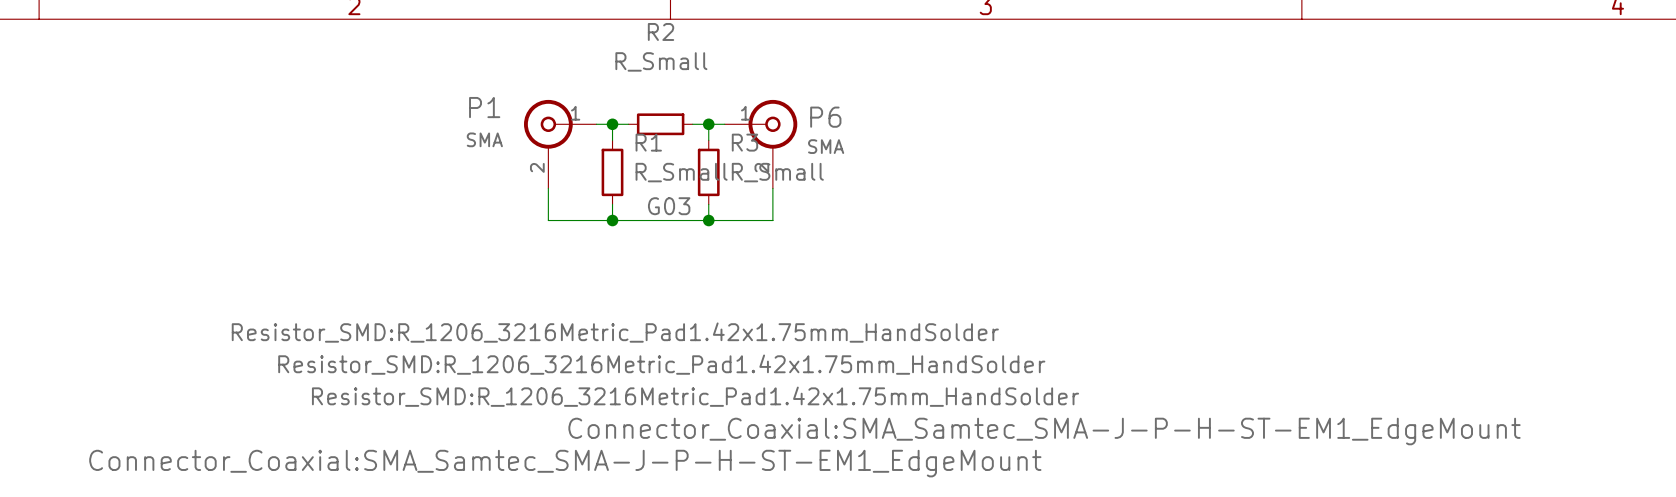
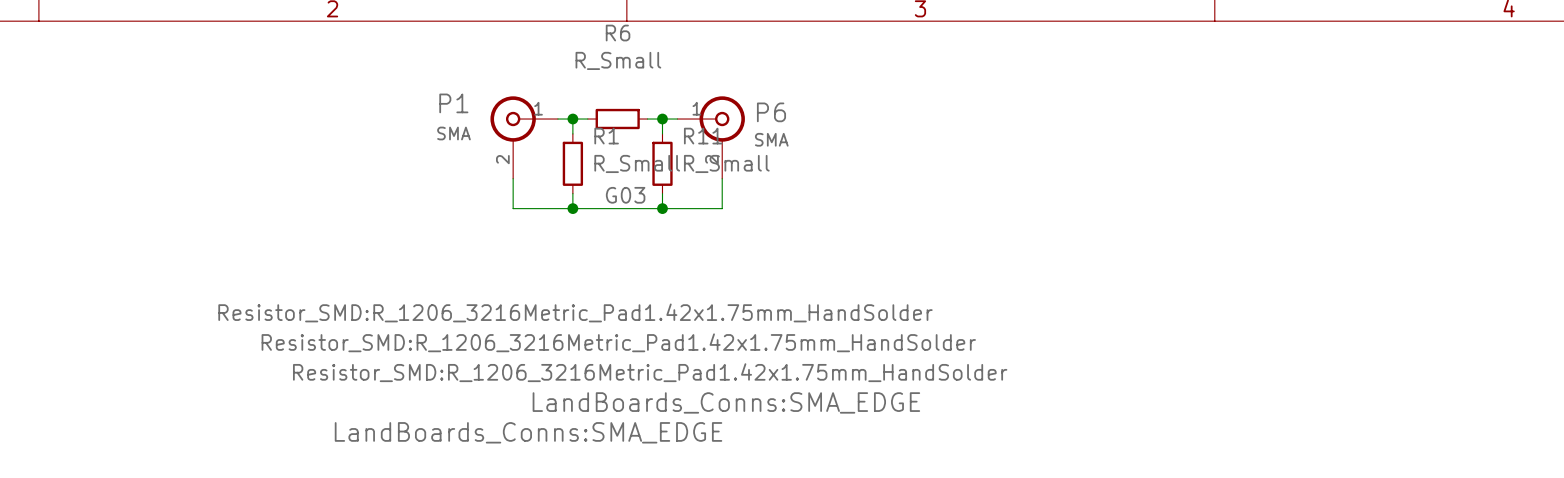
R2 name: R2 (661, 31) -> R6 (618, 33)
R3 name: R3 (744, 142) -> R11 (703, 136)
P6 text: Connector_Coaxial:SMA_Samtec_SMA-J-P-H-ST-EM1_EdgeMount (1044, 431) -> LandBoards_Conns:SMA_EDGE (726, 402)
P1 text: Connector_Coaxial:SMA_Samtec_SMA-J-P-H-ST-EM1_EdgeMount (565, 463) -> LandBoards_Conns:SMA_EDGE (528, 432)

